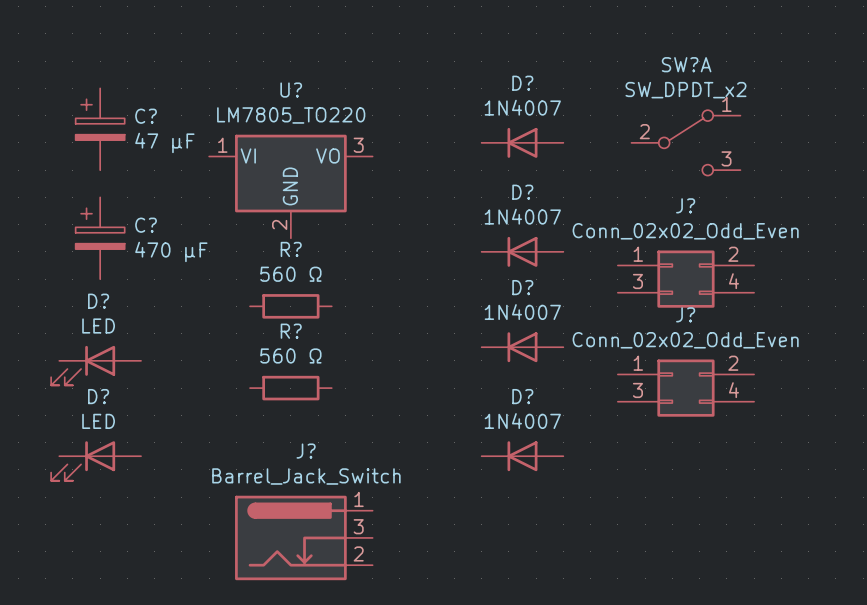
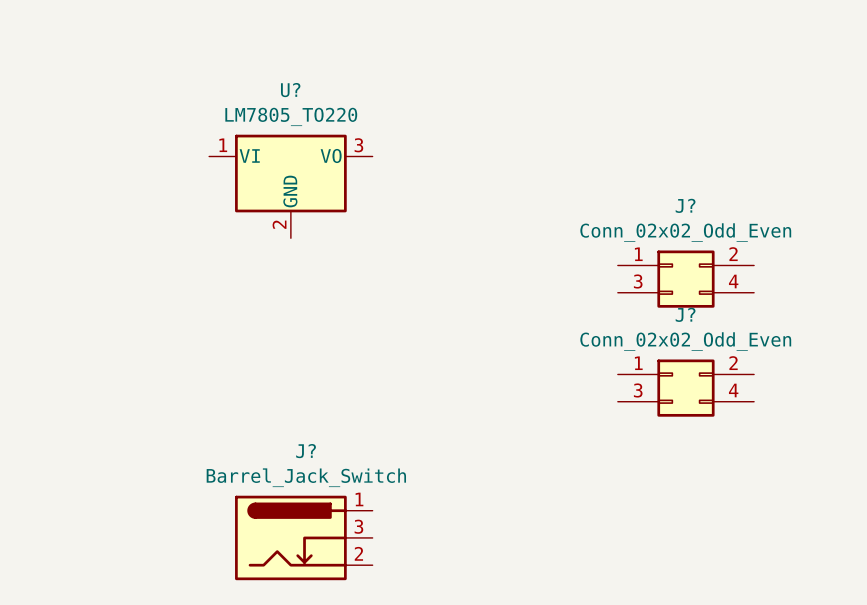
C?: 47 μF (100, 129) -> none
D?: 1N4007 (522, 142) -> none
SW?A: SW_DPDT_x2 (685, 142) -> none
C?: 470 μF (100, 238) -> none
D?: 1N4007 (522, 251) -> none
R?: 560 Ω (290, 306) -> none
D?: 1N4007 (522, 347) -> none
D?: LED (96, 365) -> none
R?: 560 Ω (290, 388) -> none
D?: 1N4007 (522, 456) -> none
D?: LED (96, 460) -> none

